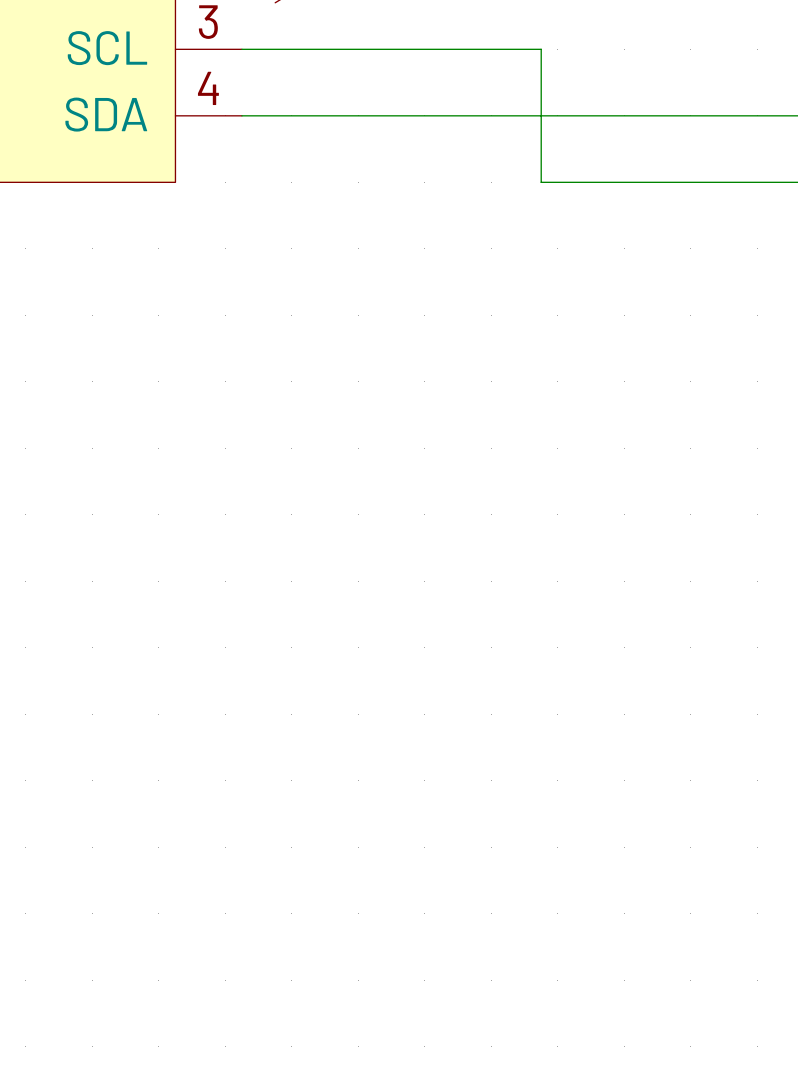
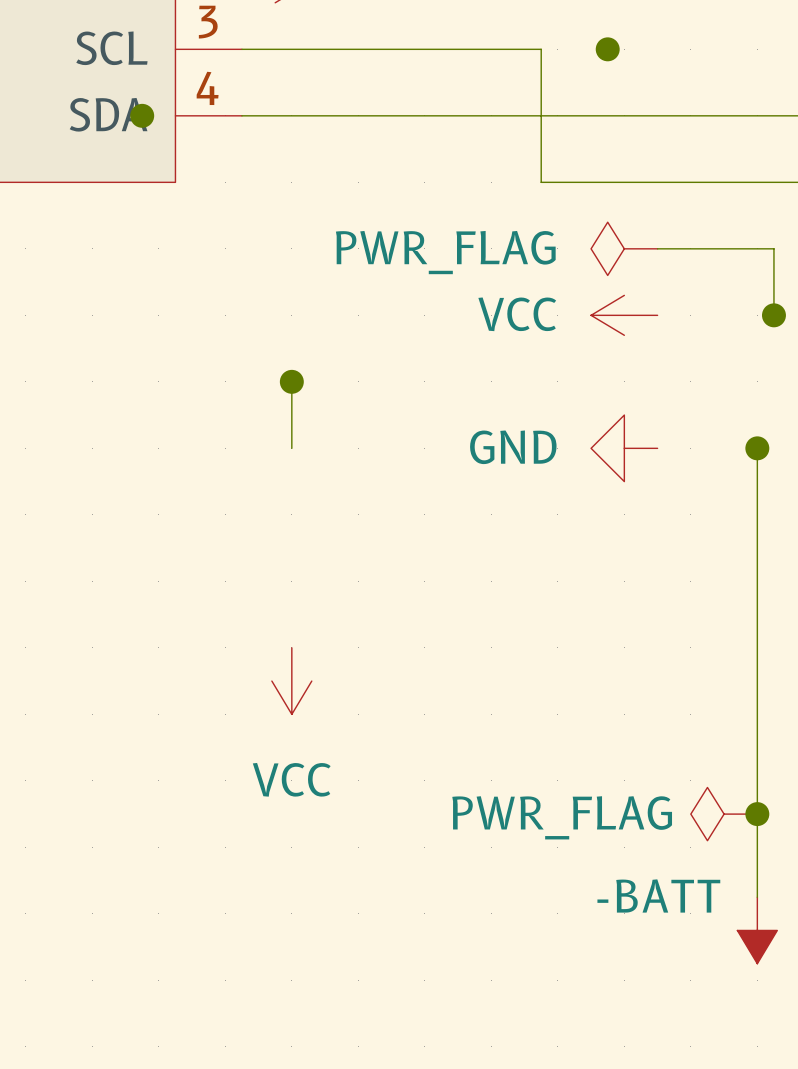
junction: none -> (607, 49)
junction: none -> (142, 115)
power symbol: none -> PWR_FLAG (624, 248)
wire: none -> (657, 248) (773, 248) (773, 315)
power symbol: none -> VCC (624, 315)
junction: none -> (773, 315)
wire: none -> (291, 381) (291, 448)
junction: none -> (291, 381)
power symbol: none -> GND (624, 448)
wire: none -> (757, 448) (757, 897)
junction: none -> (757, 448)
power symbol: none -> VCC (291, 681)
power symbol: none -> PWR_FLAG (724, 814)
junction: none -> (757, 814)
power symbol: none -> -BATT (757, 930)

